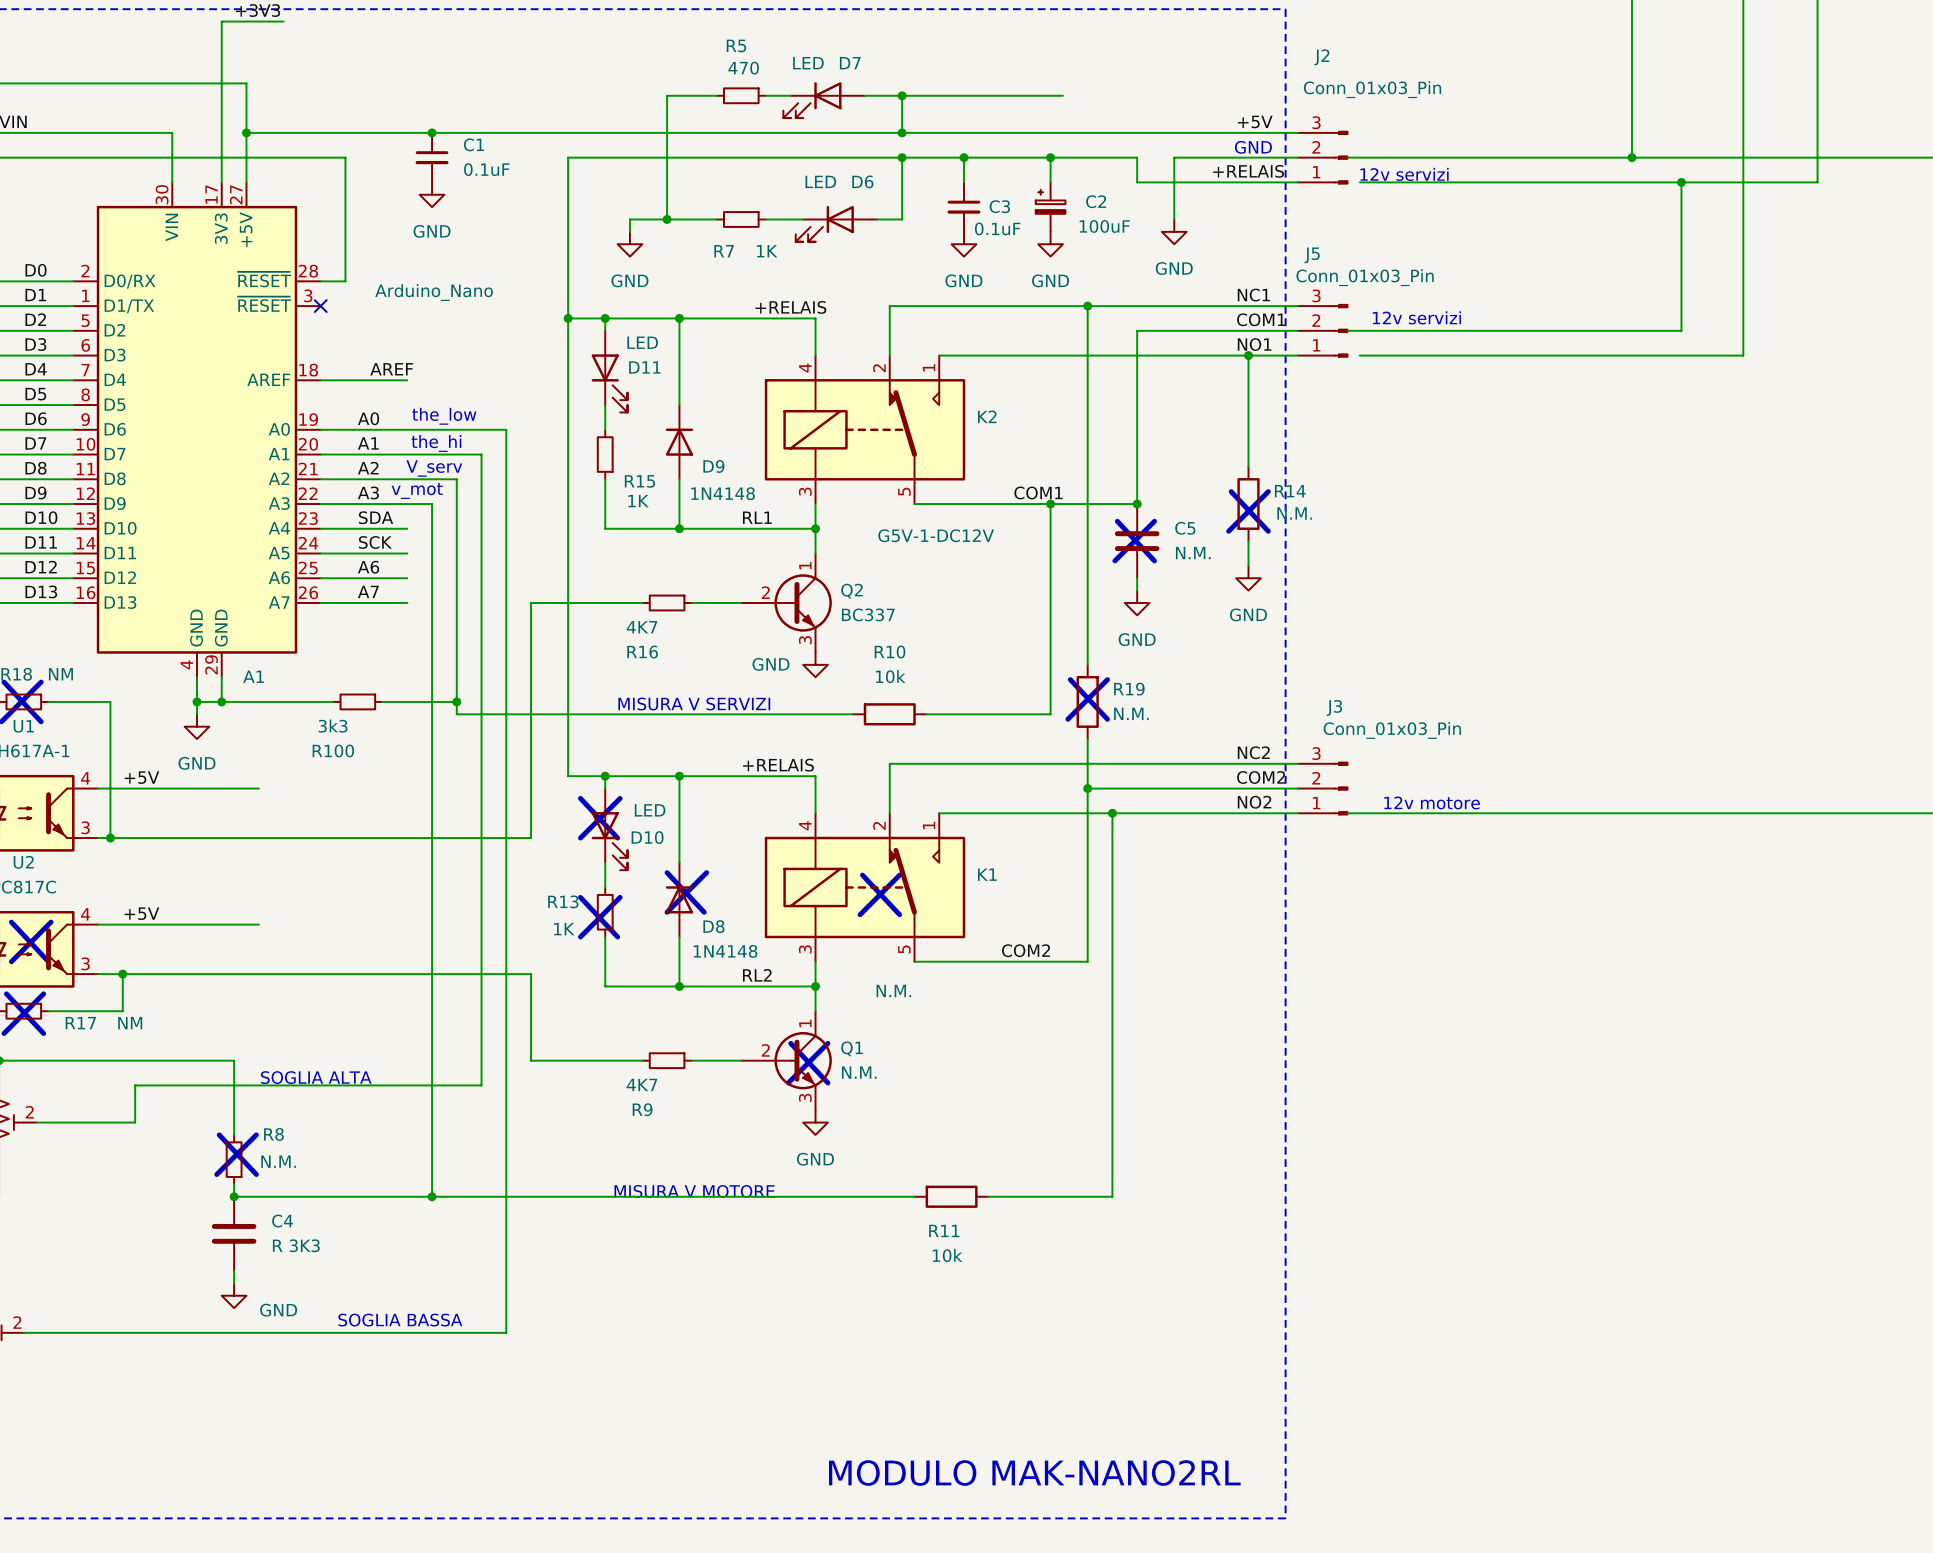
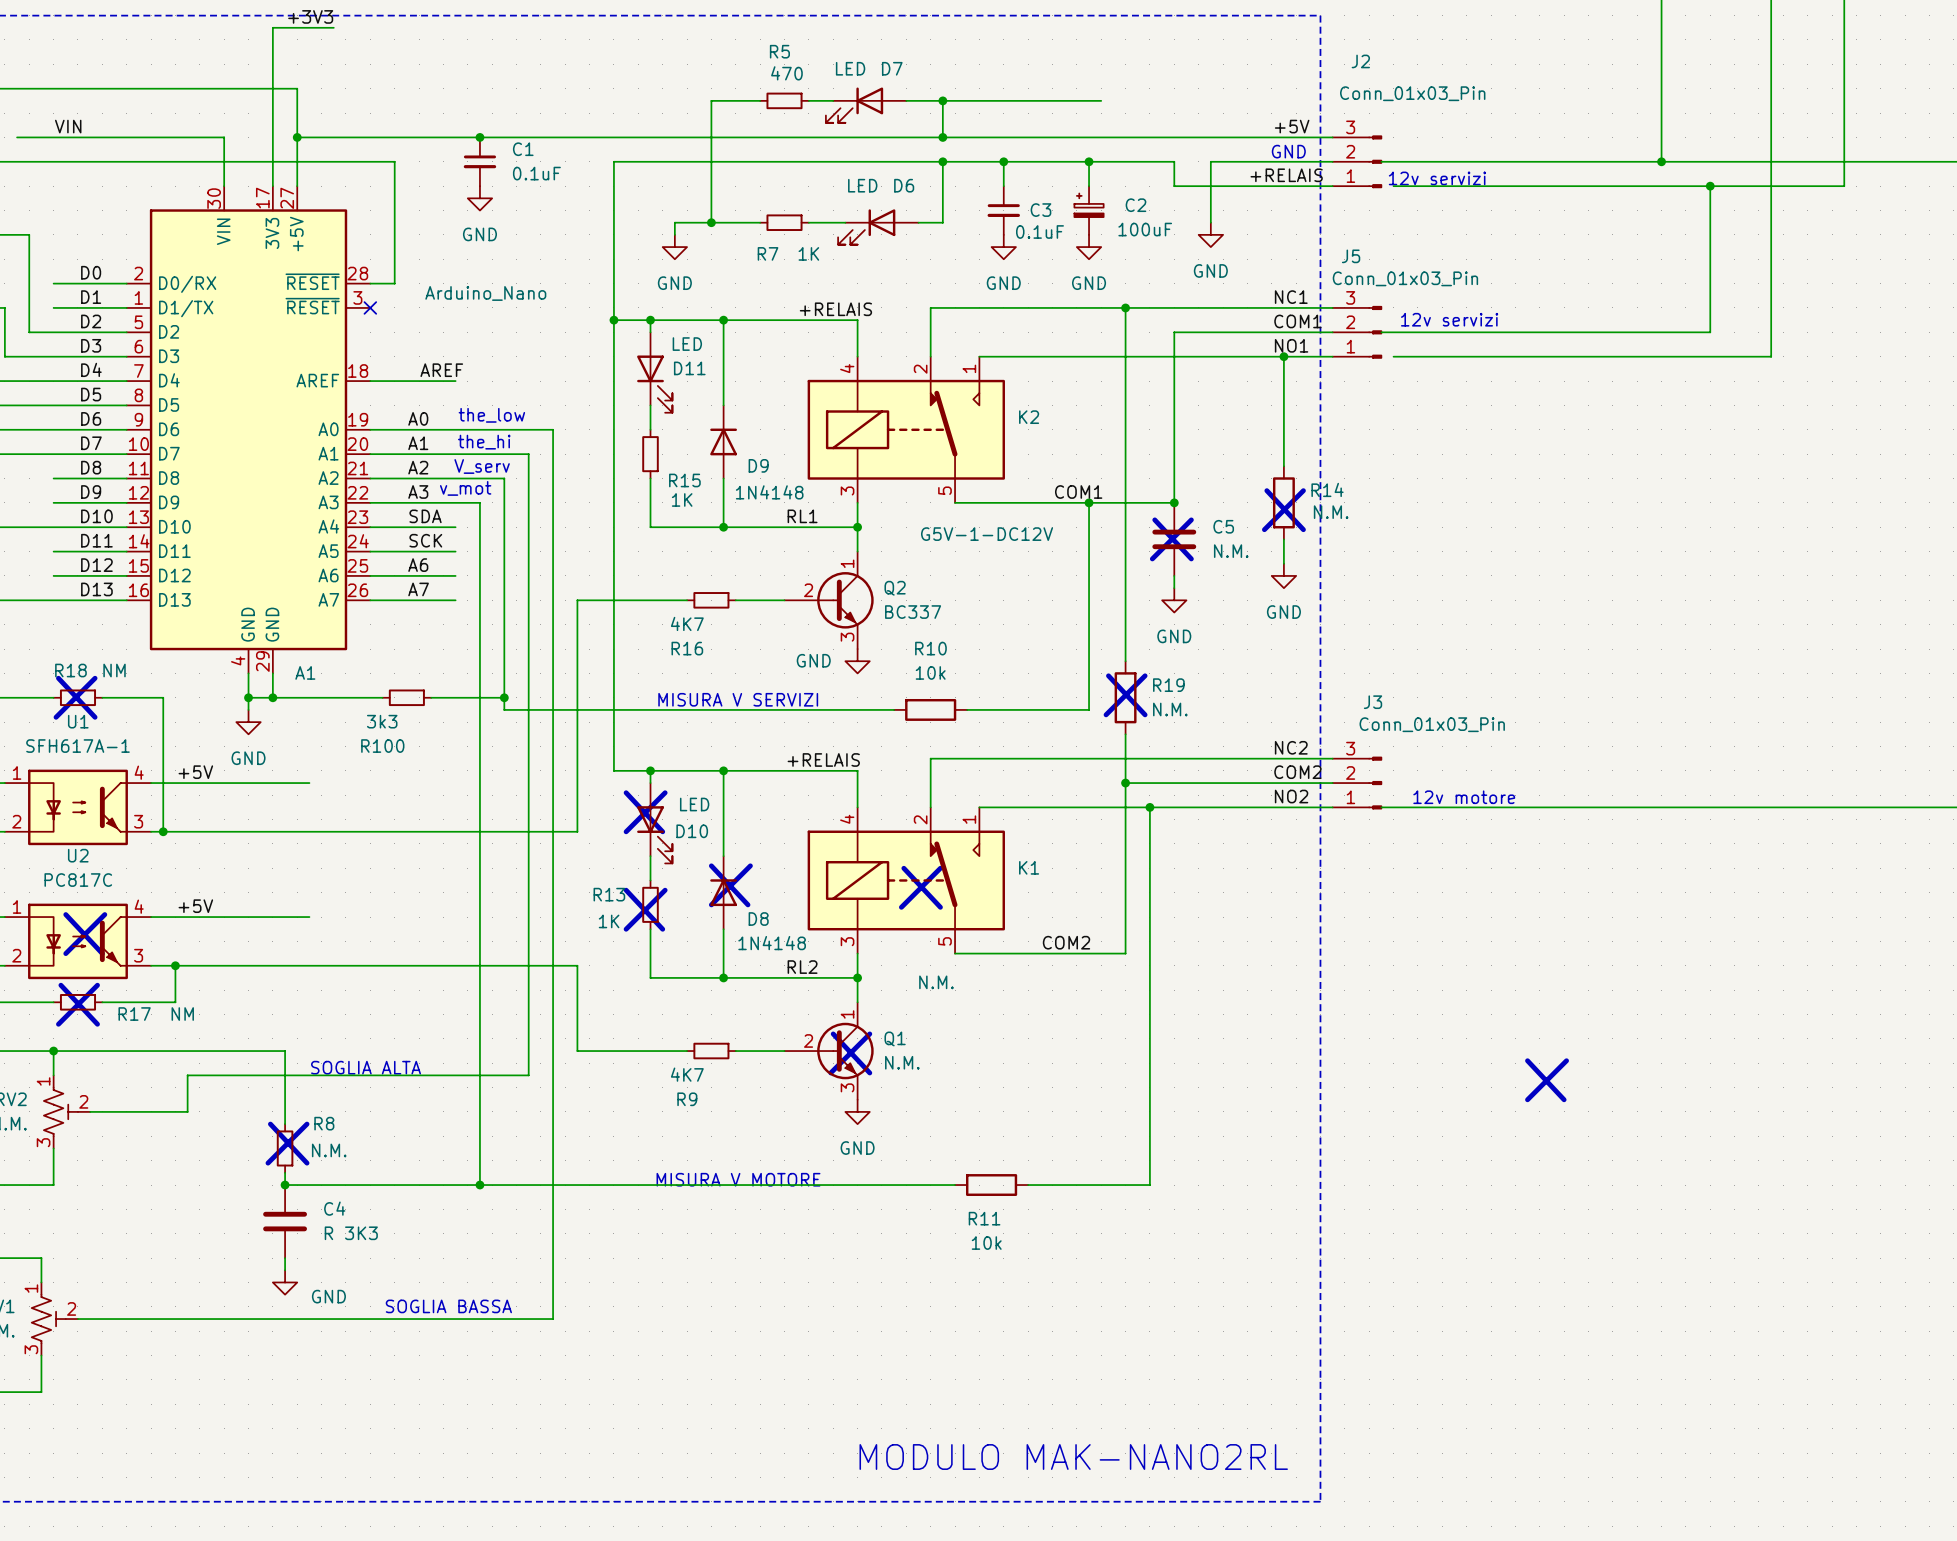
line: none -> (1527, 1060) (1564, 1099)
line: none -> (1566, 1060) (1527, 1099)

